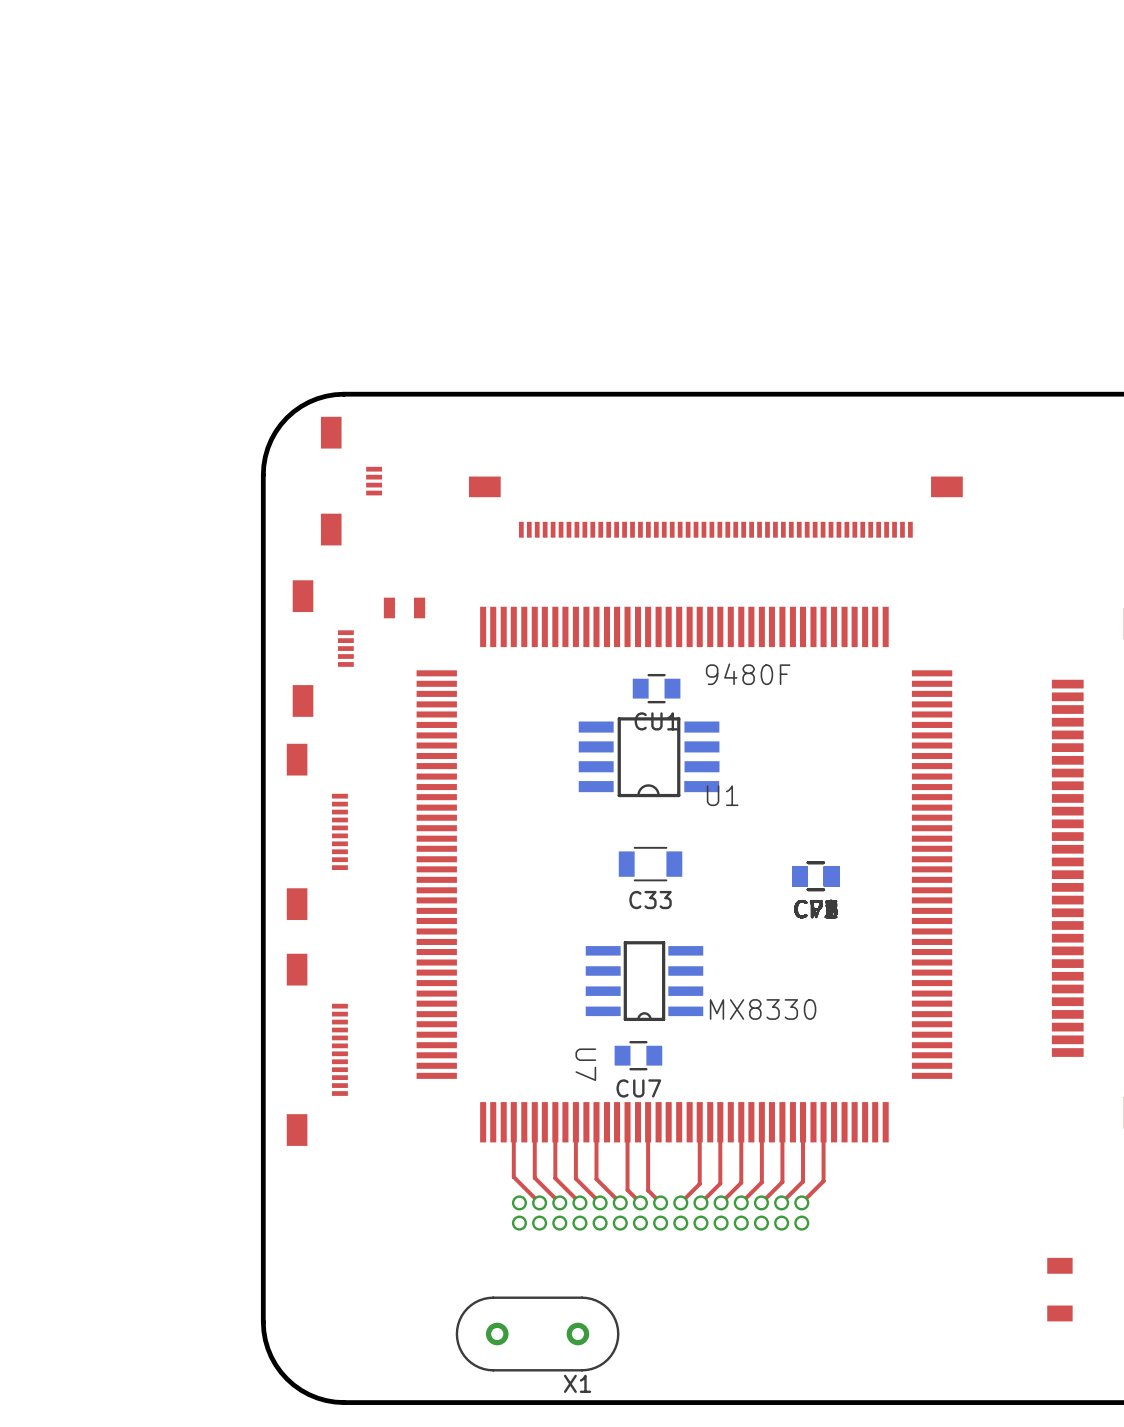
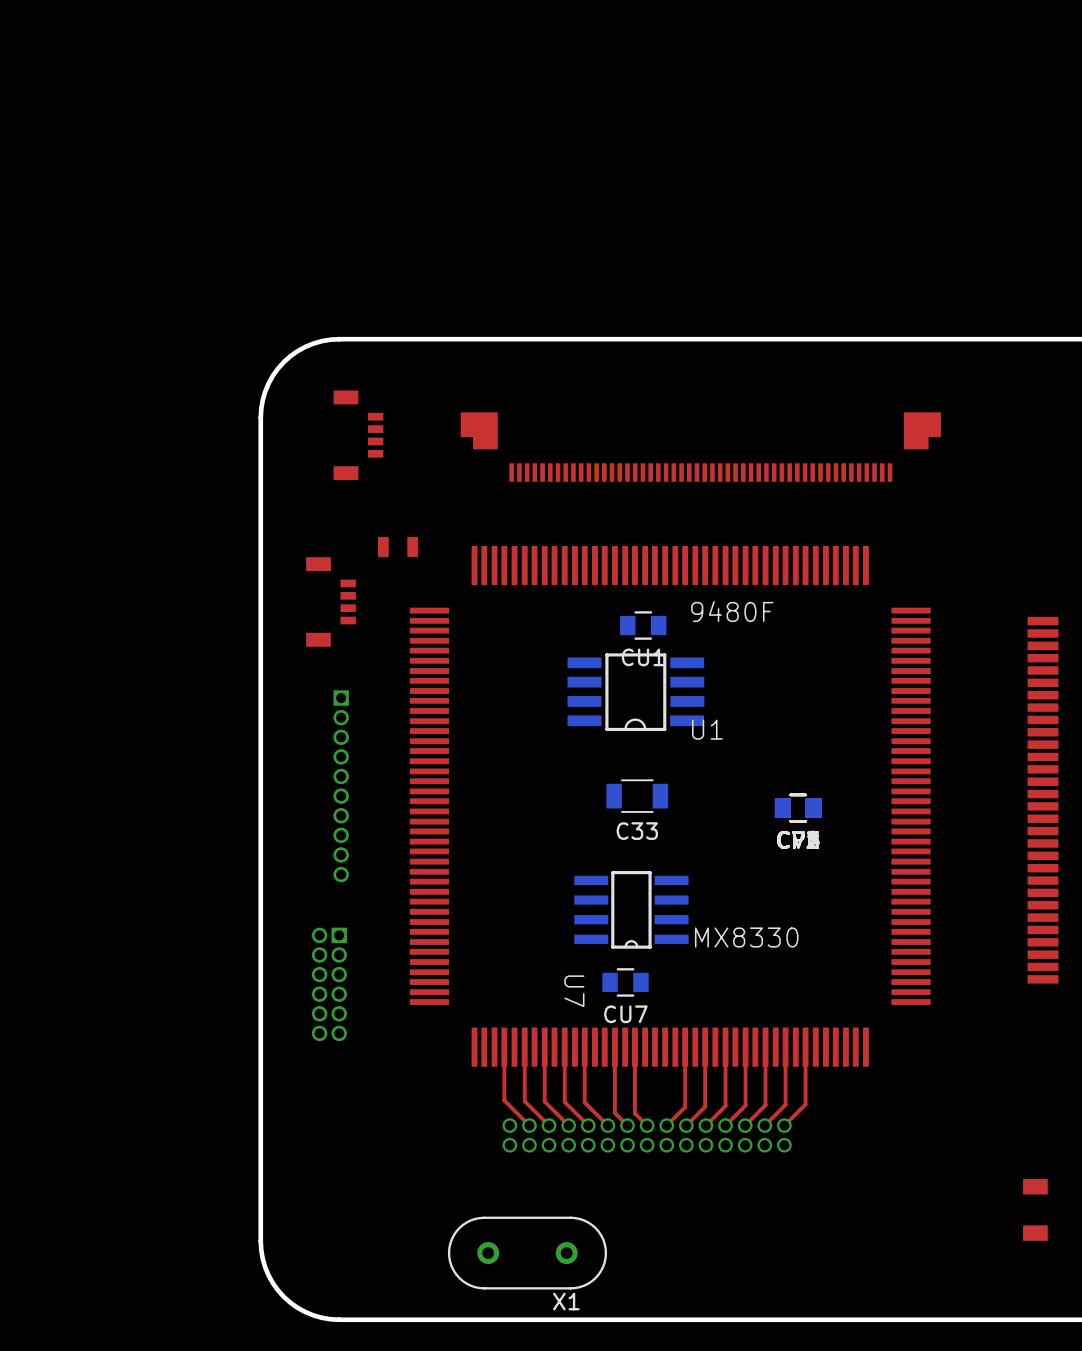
part footprint: [468, 476, 963, 538] -> [460, 412, 941, 482]
part: (351, 481) -> none
part: none -> (358, 435)
part: (323, 648) -> none
part: none -> (331, 601)
part: (317, 831) -> none
part: none -> (341, 786)
part: (317, 1049) -> none
part: none -> (329, 984)

